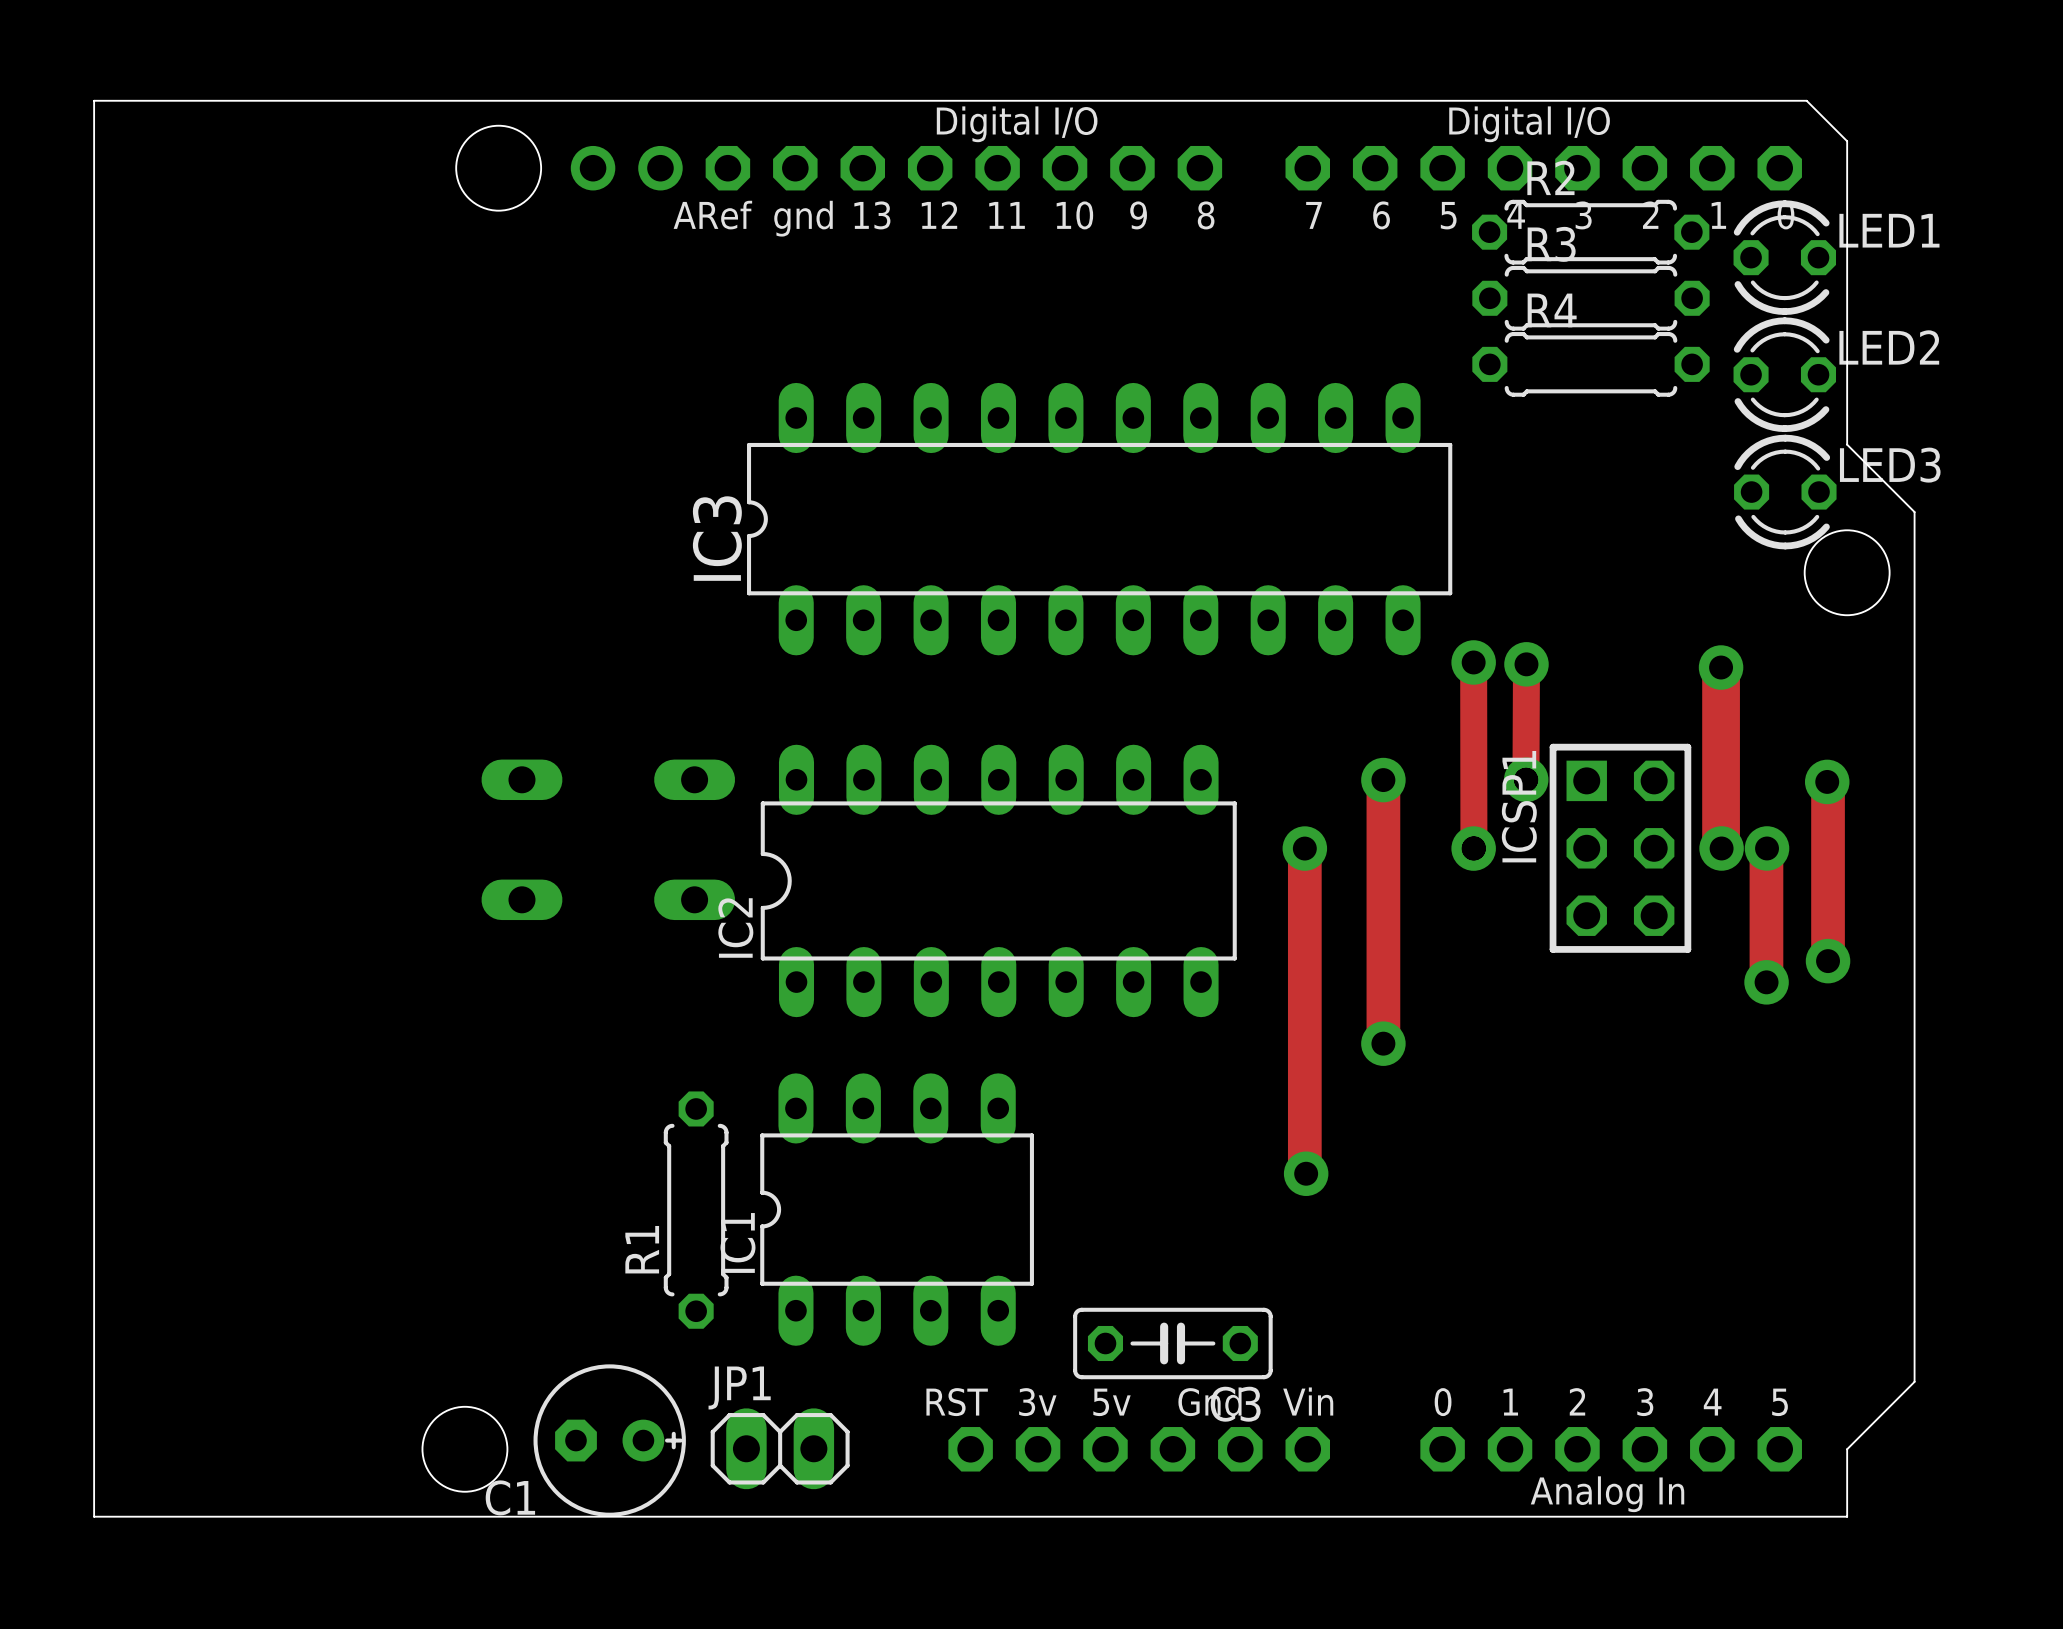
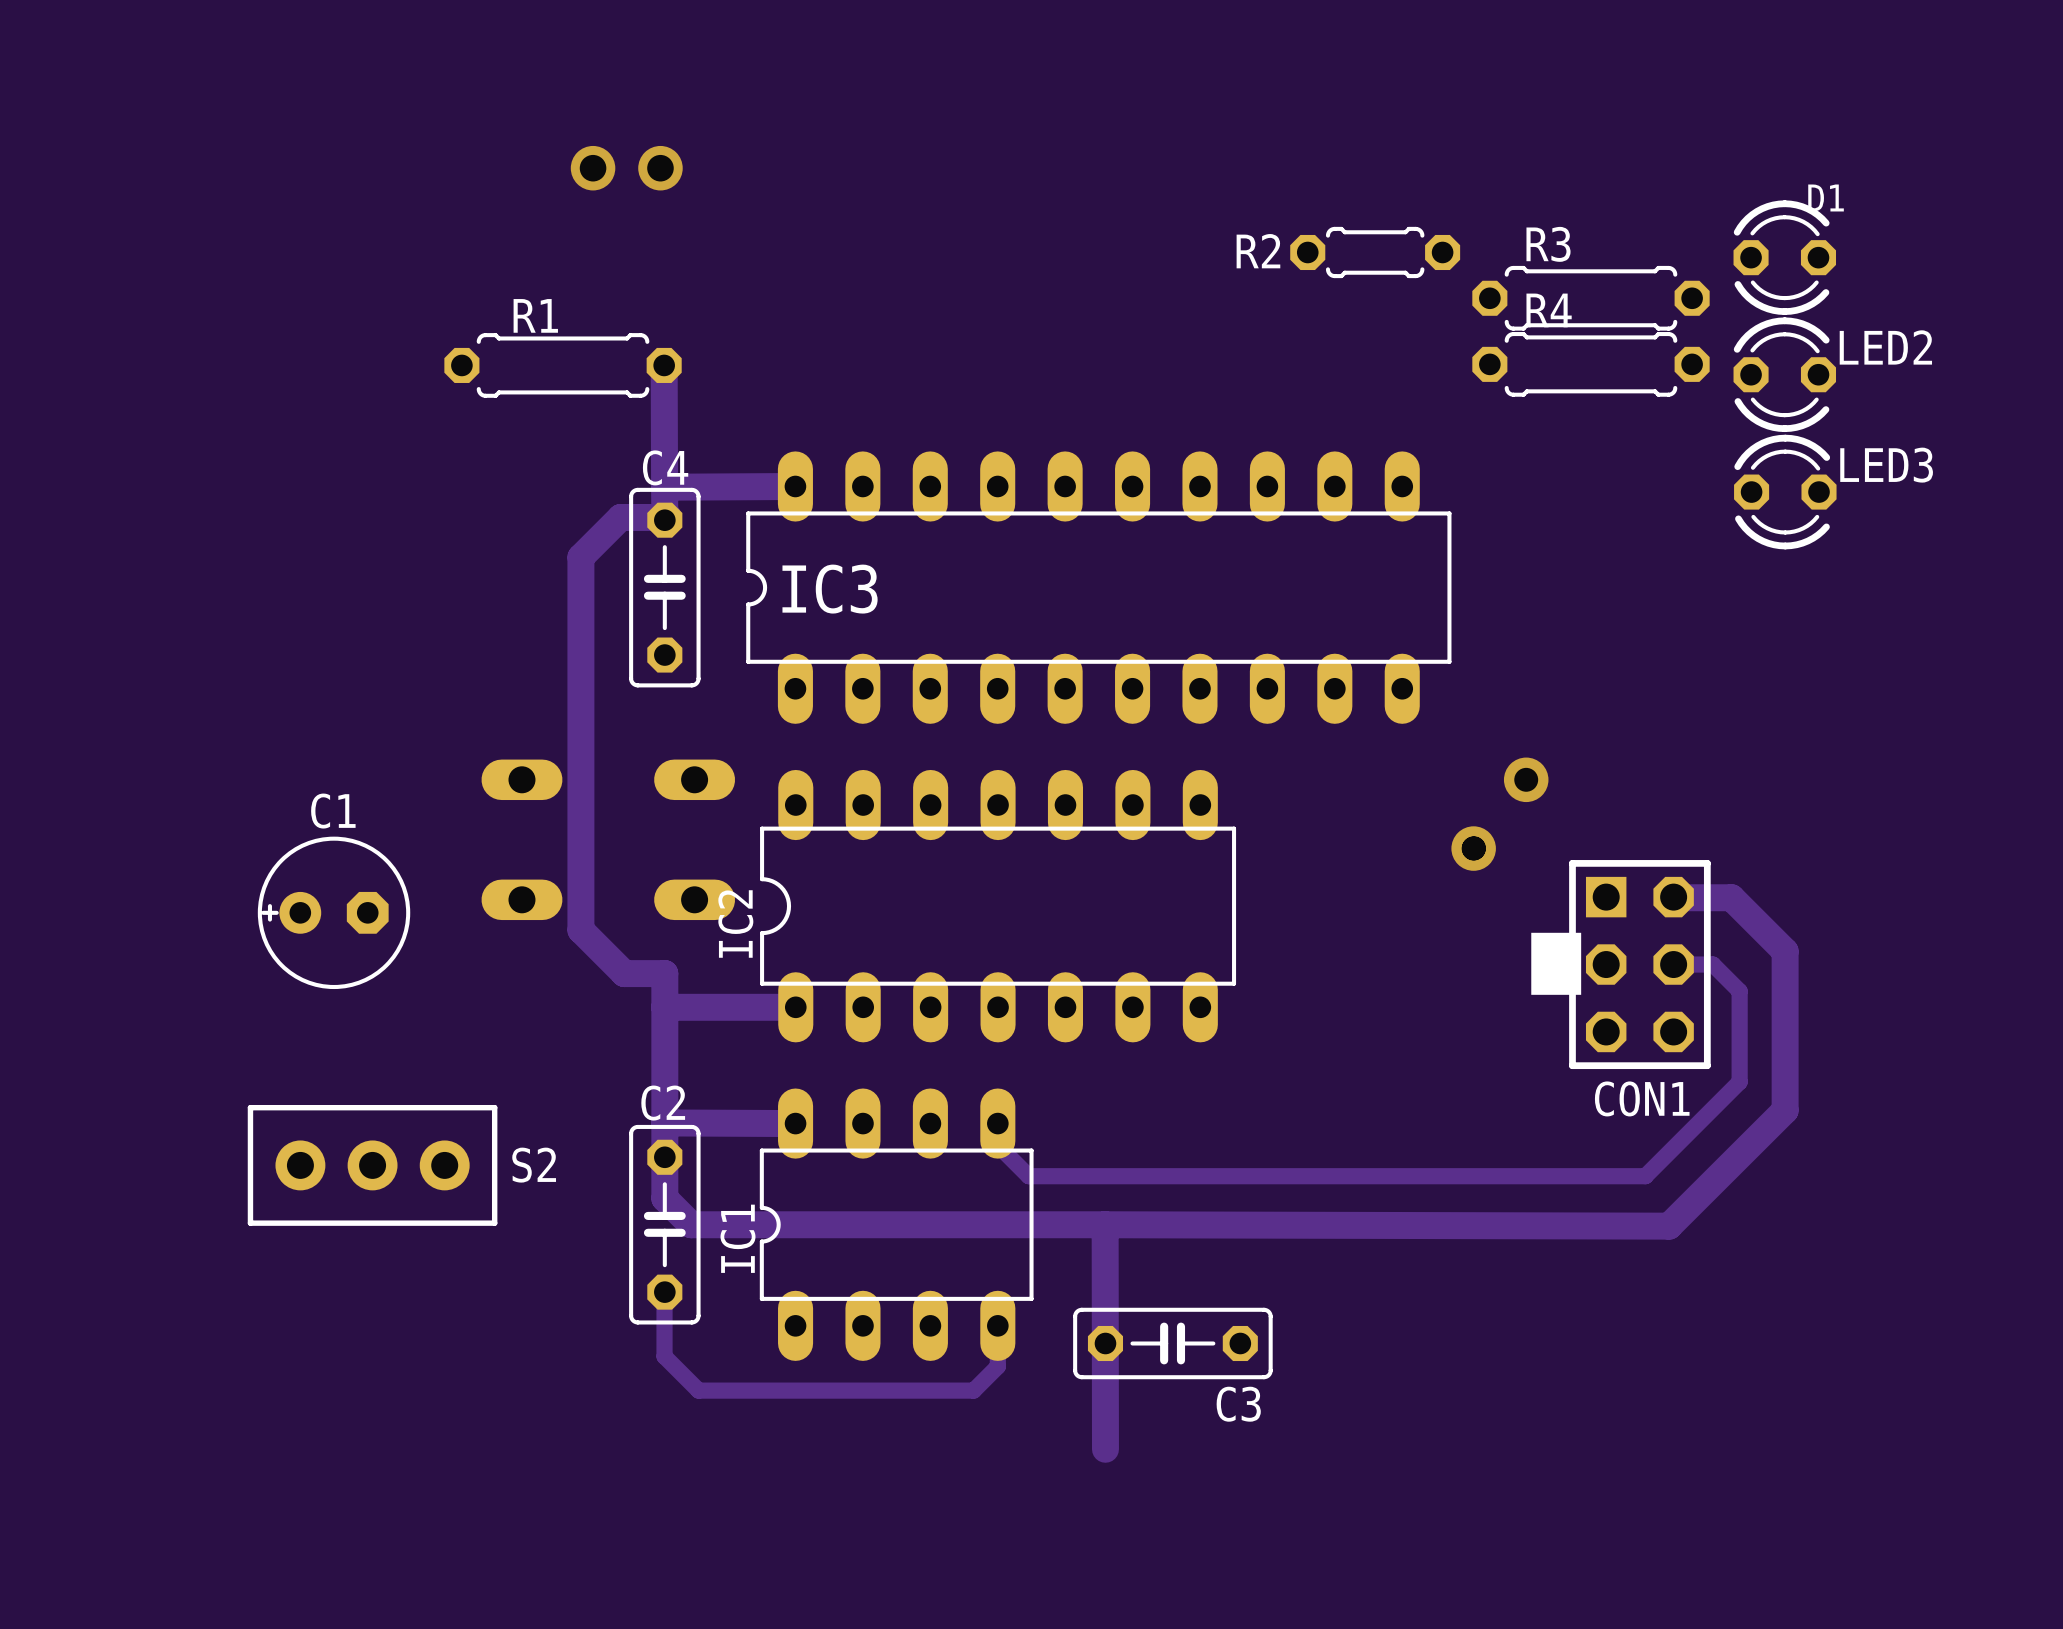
R2 name position: R2 (1550, 177) -> R2 (1258, 251)
R2 footprint: [1472, 199, 1710, 265] -> [1290, 226, 1461, 279]
LED1 name: LED1 (1889, 230) -> D1 (1826, 197)
track: none -> (664, 365) (664, 487)
track: none -> (795, 486) (664, 487)
track: none -> (664, 487) (664, 520) (664, 517) (620, 517) (580, 557) (580, 930) (624, 973) (664, 973) (664, 1198) (691, 1224) (1105, 1224)
IC3 position: (1099, 519) -> (1098, 587)
IC3 name rotation: 0° (717, 538) -> 90° clockwise (830, 589)
C4: none -> (664, 587)
track: (1473, 662) (1473, 848) -> none
via: (1473, 662) -> none
track: (1526, 664) (1525, 779) -> none
via: (1526, 664) -> none
track: (1721, 667) (1721, 849) -> none
via: (1721, 667) -> none
track: (1383, 779) (1383, 1044) -> none
via: (1383, 780) -> none
track: (1828, 780) (1828, 960) -> none
via: (1827, 781) -> none
part: (1004, 808) -> none
track: (1766, 847) (1766, 982) -> none
track: (1304, 848) (1304, 1175) -> none
via: (1304, 848) -> none
ICSP1: (1620, 848) -> none
via: (1721, 848) -> none
via: (1767, 848) -> none
IC2 position: (998, 880) -> (998, 906)
track: none -> (1673, 897) (1731, 897) (1785, 951) (1785, 1110) (1669, 1226) (1105, 1224)
drawing: none -> [1531, 932, 1582, 995]
via: (1828, 961) -> none
CON1: none -> (1639, 964)
track: none -> (1673, 964) (1712, 964) (1739, 991) (1739, 1082) (1645, 1176) (1028, 1176) (997, 1144) (997, 1123)
via: (1766, 982) -> none
track: none -> (664, 1007) (795, 1007)
via: (1383, 1043) -> none
track: none -> (664, 1122) (795, 1123)
S2: none -> (372, 1165)
via: (1306, 1173) -> none
IC1 position: (897, 1209) -> (896, 1224)
R1 rotation: 0° (696, 1210) -> 90° clockwise (563, 365)
R1 position: (696, 1210) -> (563, 365)
C2: none -> (664, 1224)
track: none -> (1105, 1224) (1105, 1449)
track: none -> (664, 1292) (664, 1356) (698, 1390) (973, 1390) (997, 1366) (997, 1325)
C1 rotation: 0° (609, 1440) -> 180° (334, 912)
C1 position: (609, 1440) -> (334, 912)
JP1: (780, 1448) -> none
C1 name position: C1 (510, 1497) -> C1 (333, 811)

